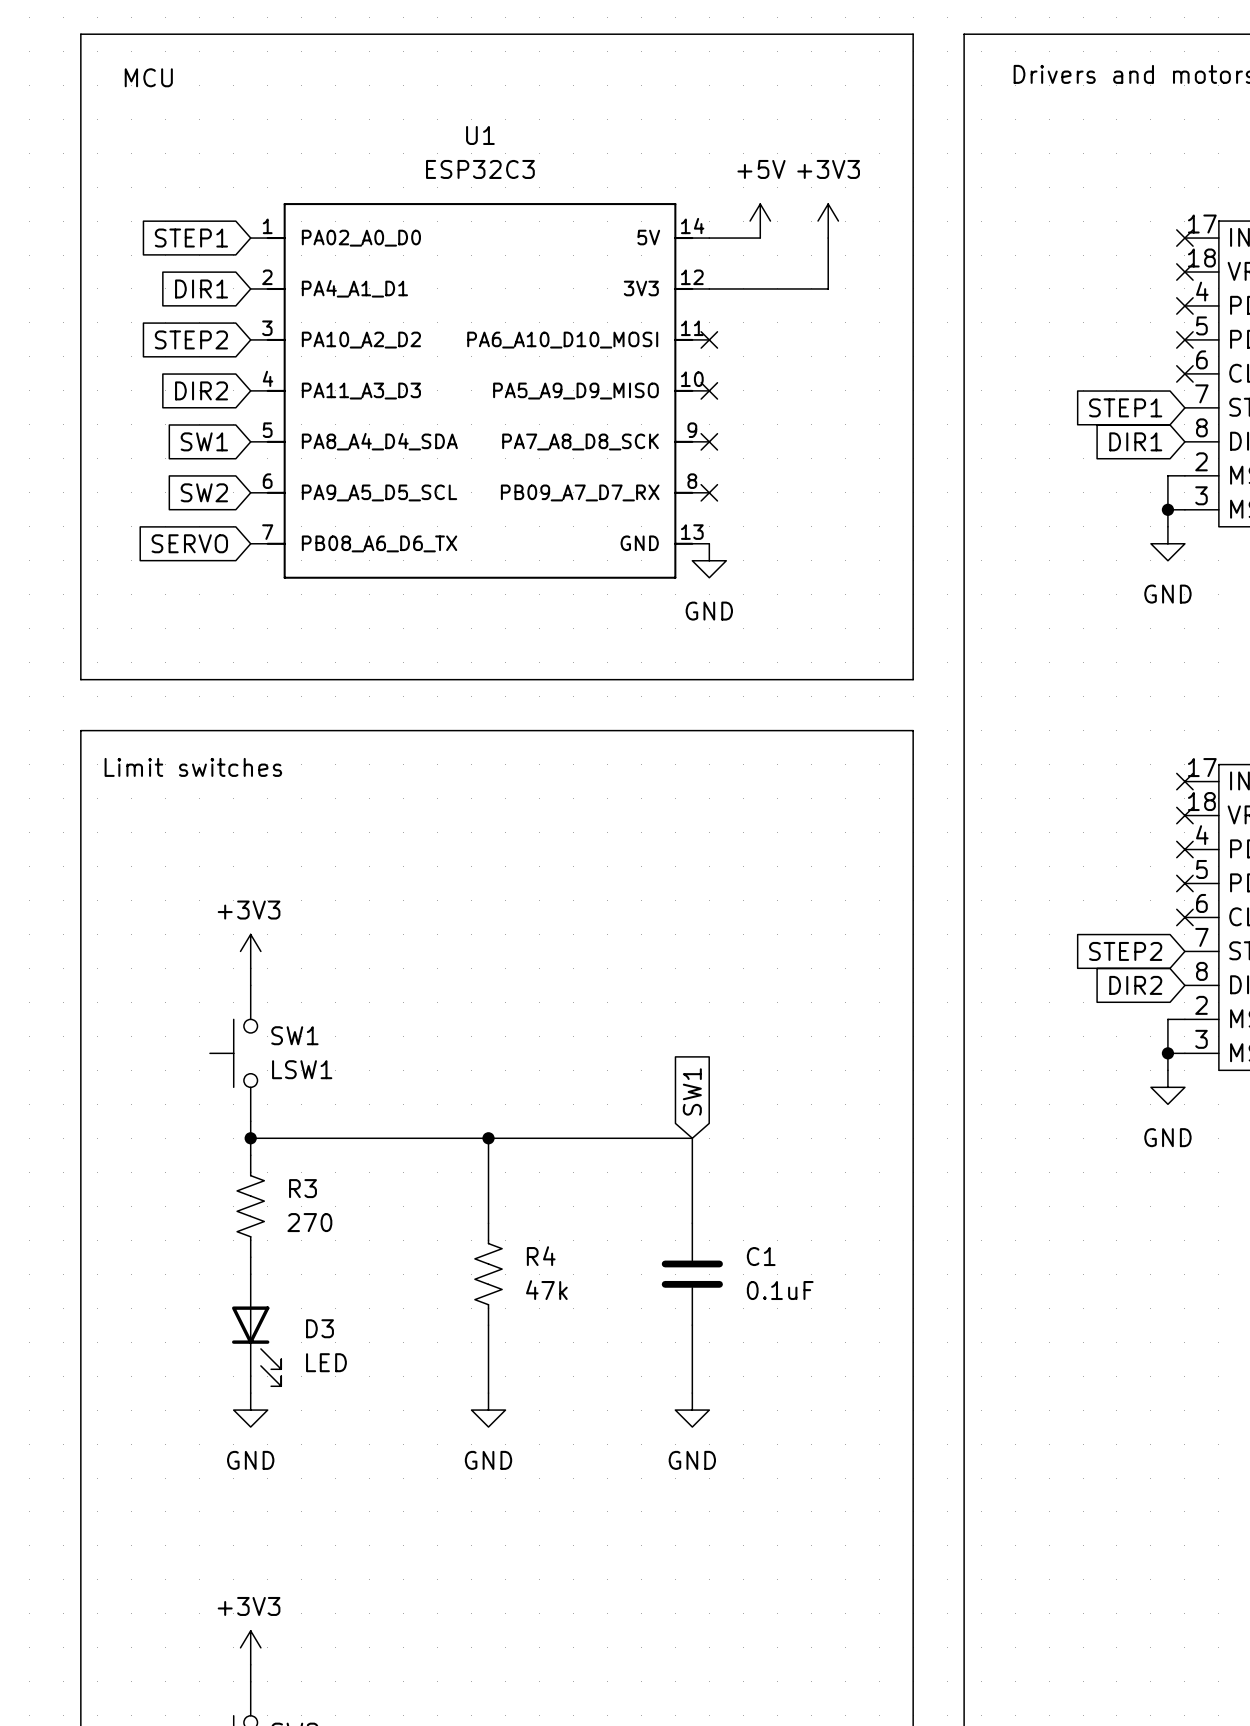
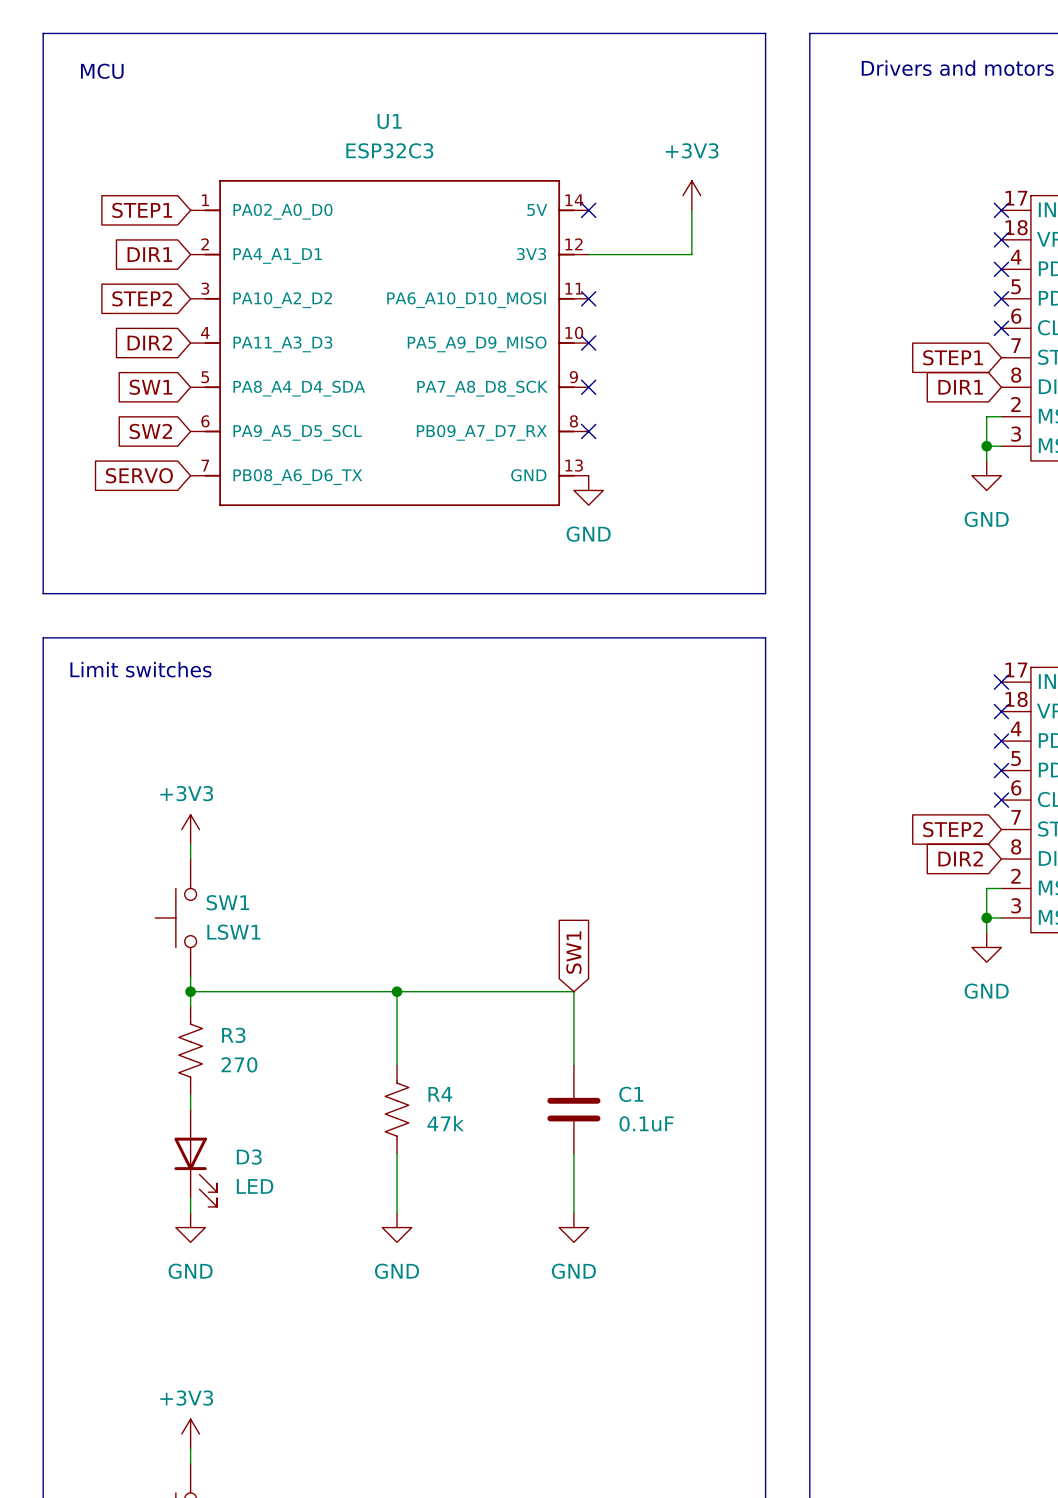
power symbol: +5V (760, 221) -> none
wire: (709, 238) (760, 238) -> none
no-connect mark: none -> (588, 210)

